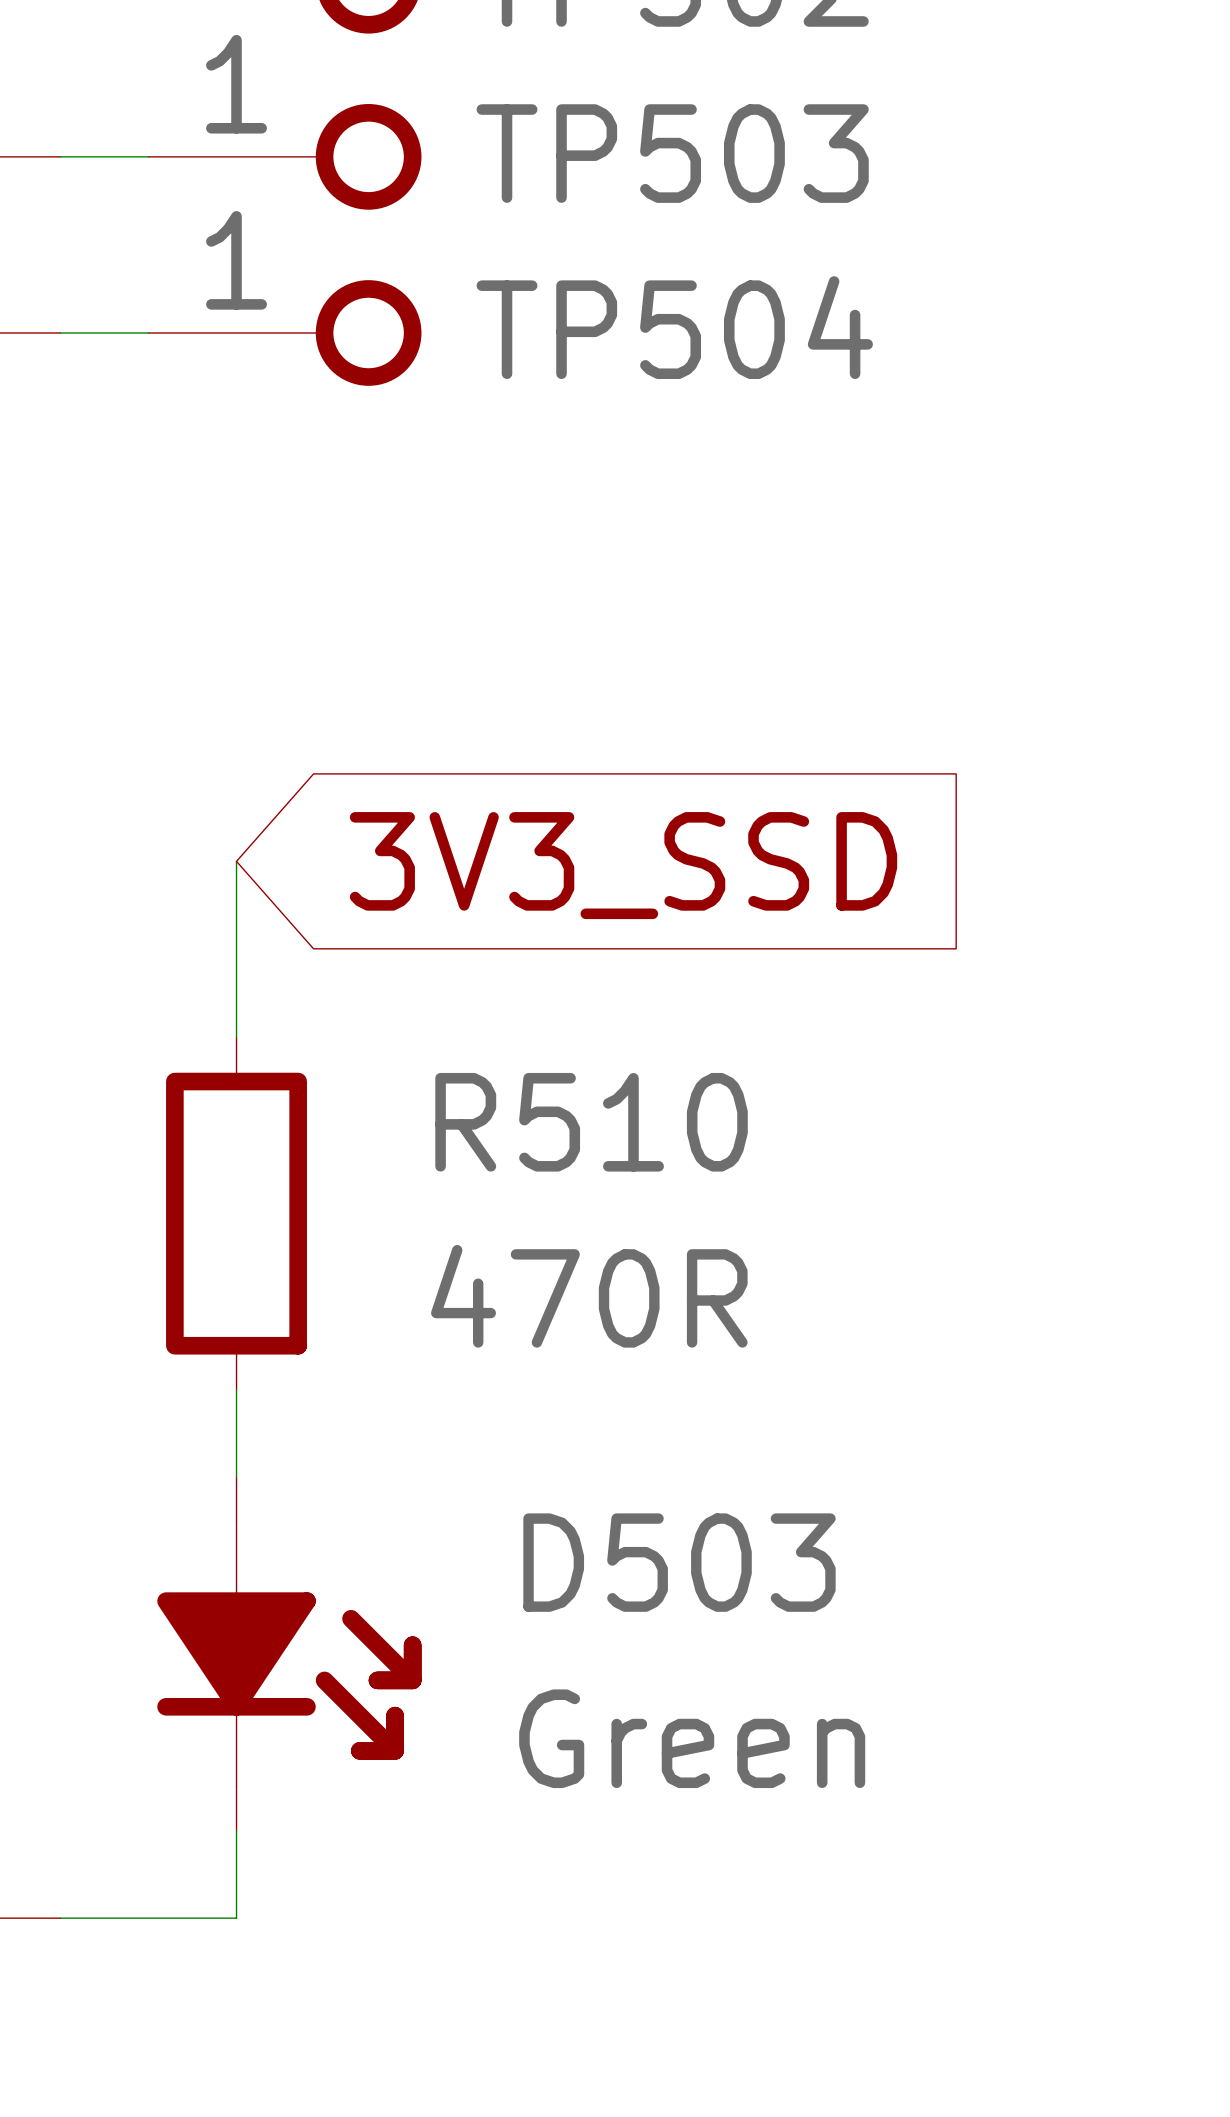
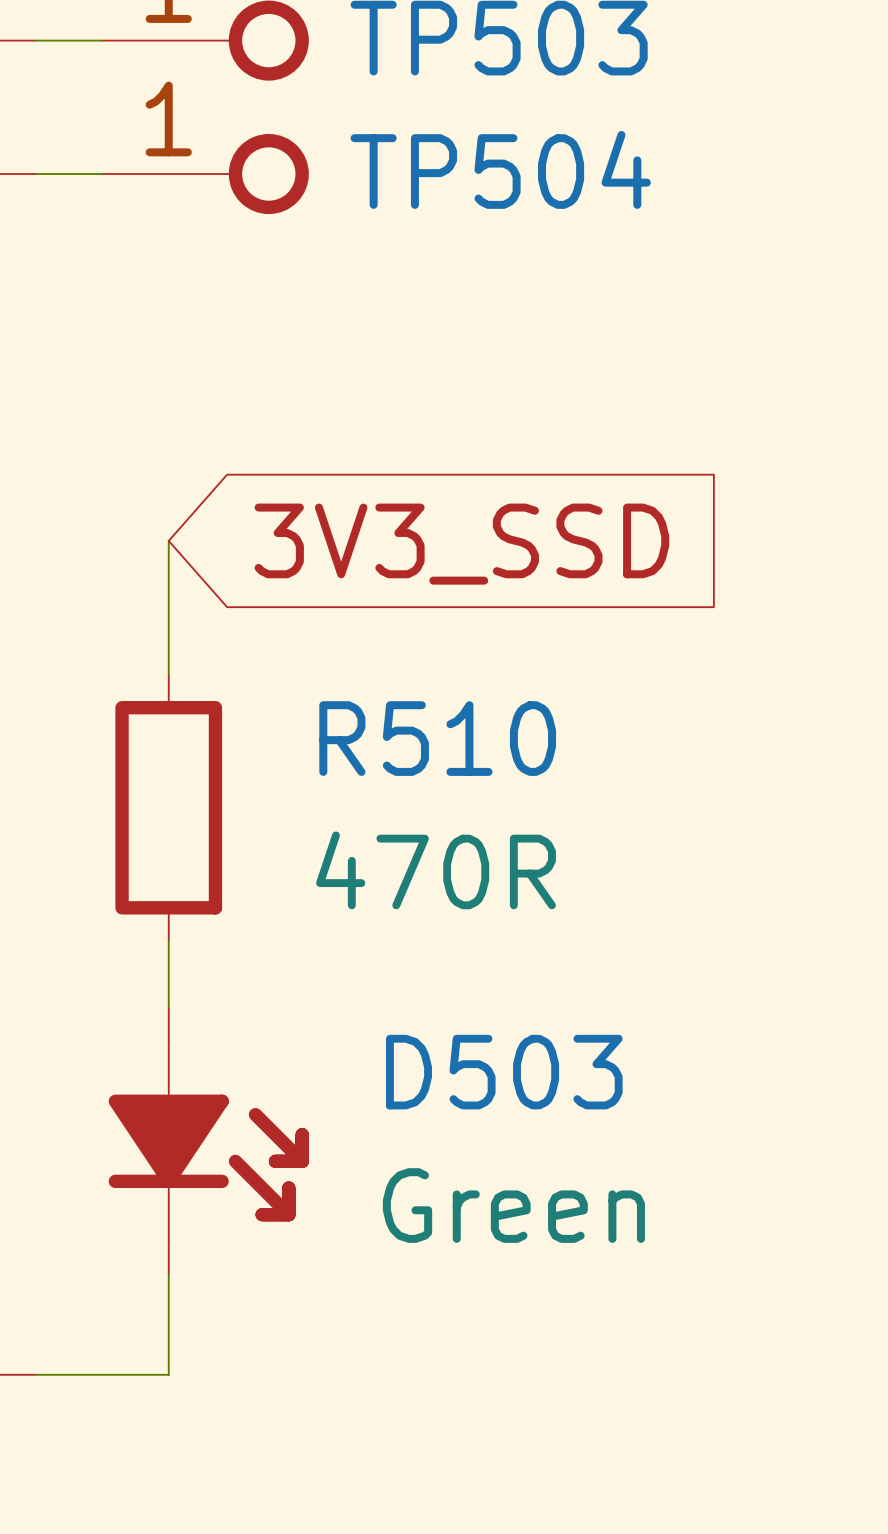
wire: none -> (168, 540) (168, 574)
global label position: 3V3_SSD (623, 865) -> 3V3_SSD (461, 544)
R510 position: (236, 1213) -> (168, 807)
D503 position: (289, 1653) -> (208, 1141)

